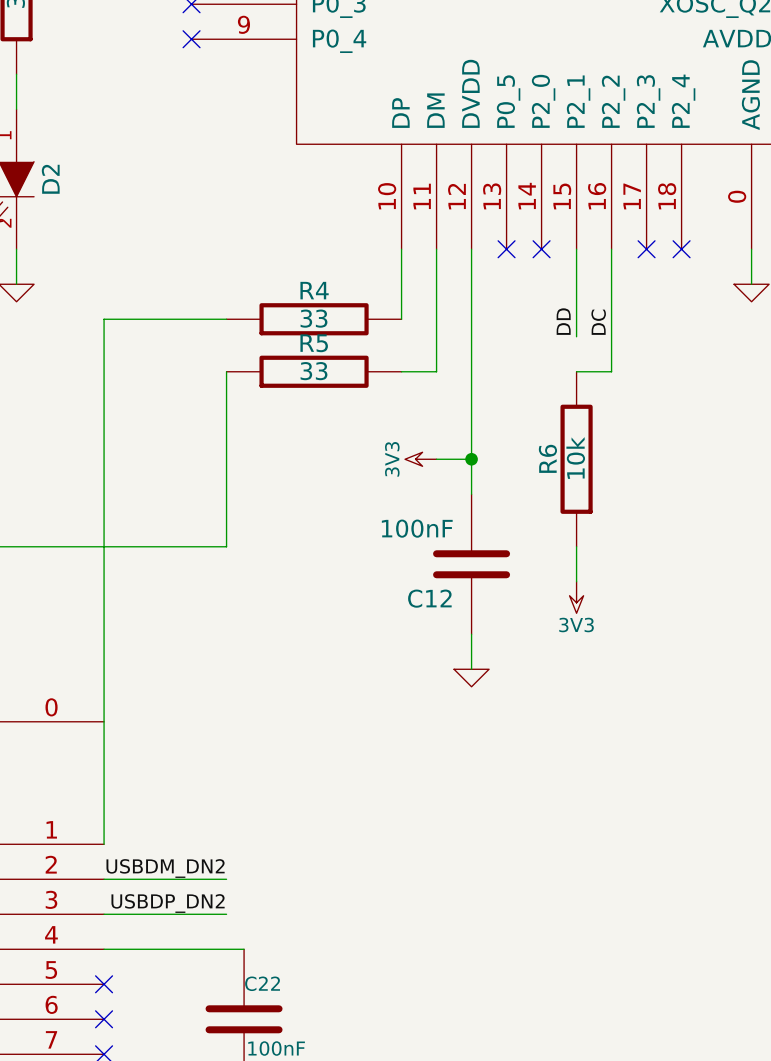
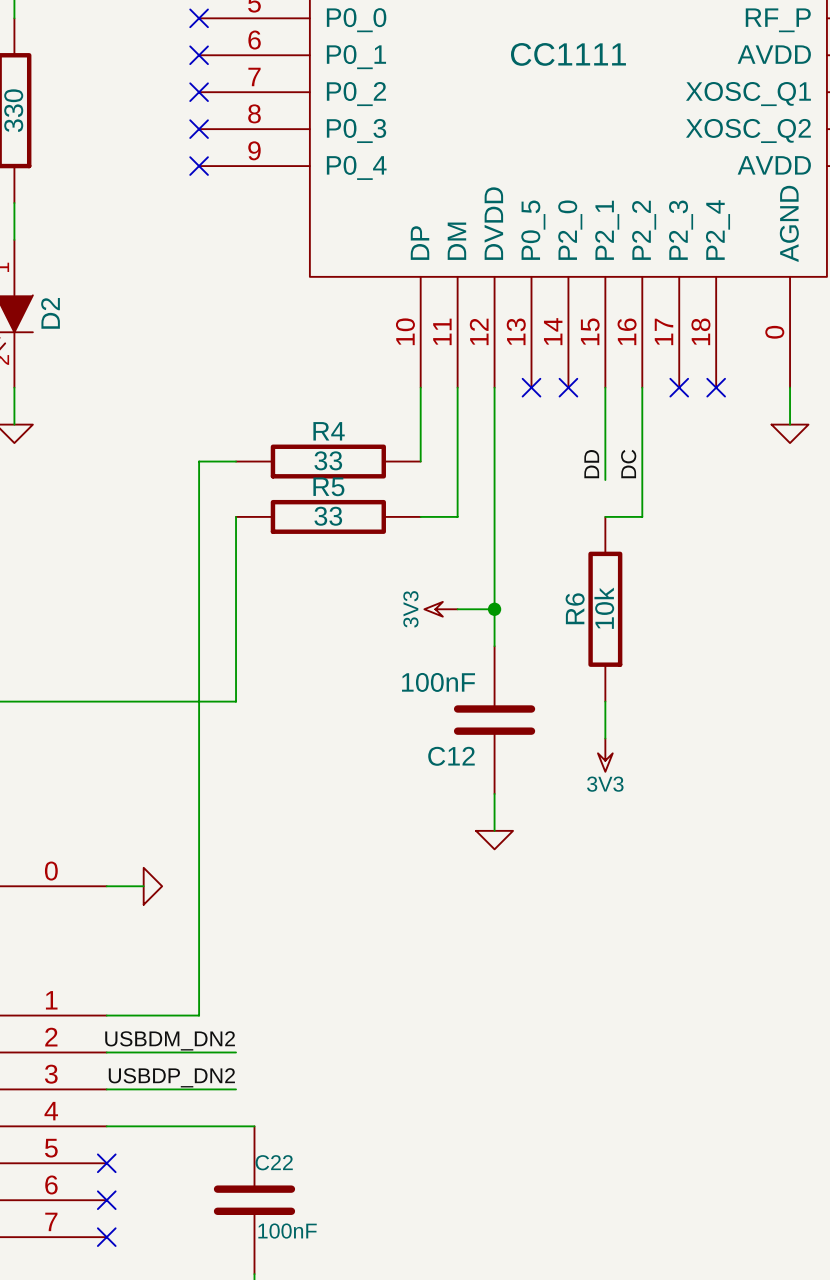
wire: (191, 319) (104, 319) (104, 844) -> (199, 461) (199, 1015) (106, 1015)
wire: none -> (106, 886) (143, 886)
power symbol: none -> (152, 886)

